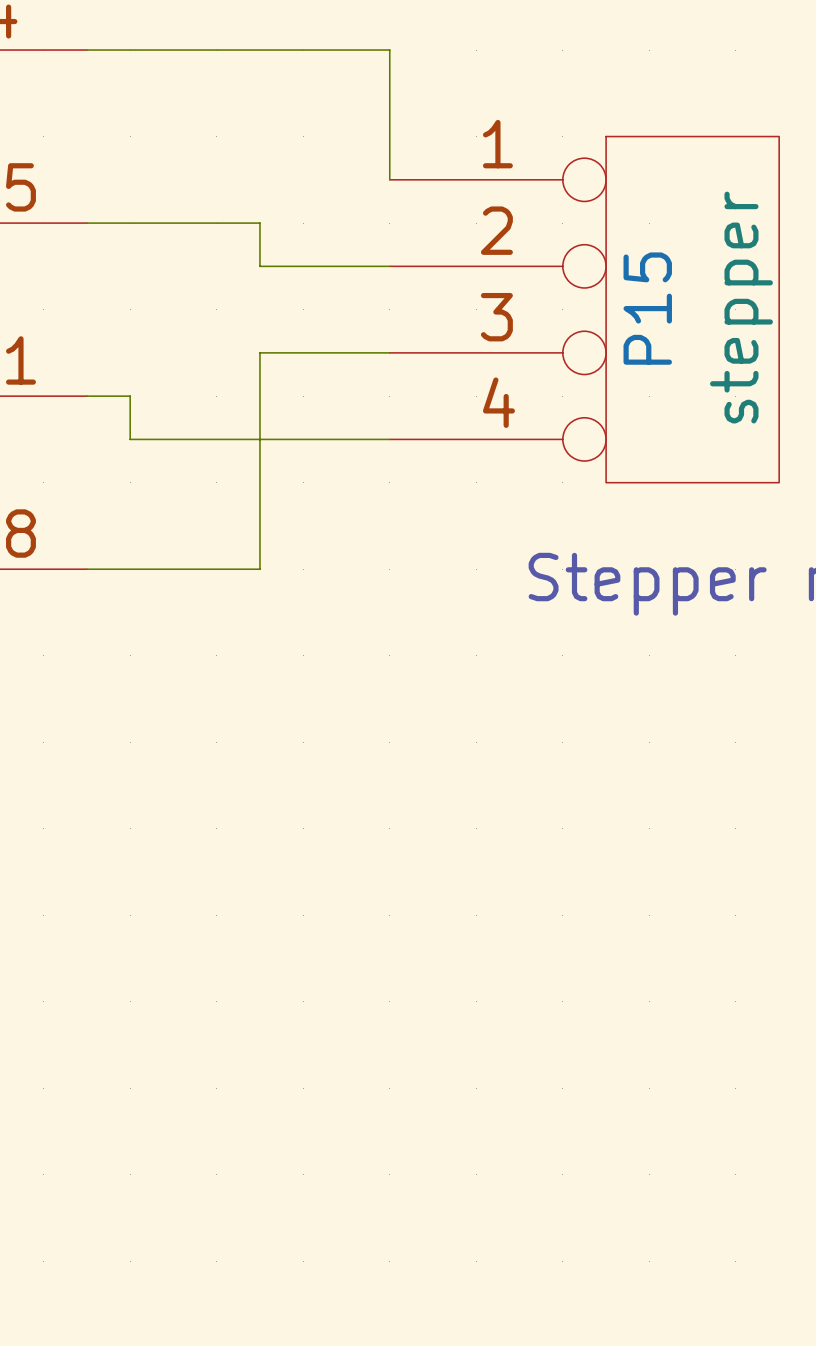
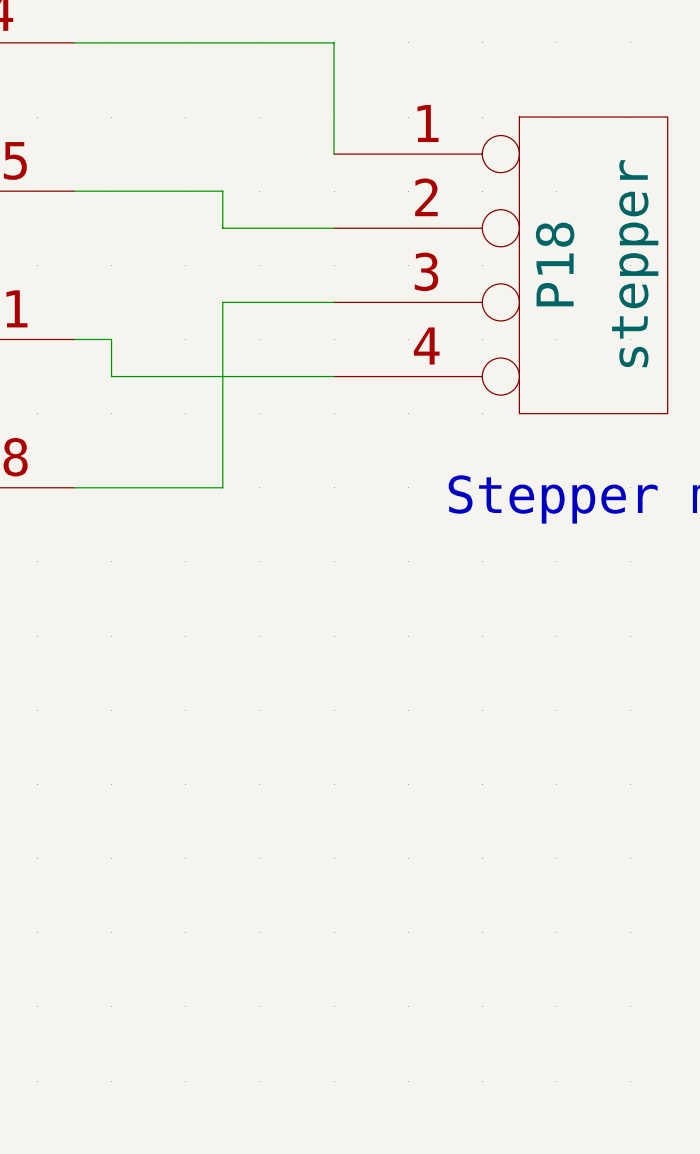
P15 name: P15 (647, 308) -> P18 (555, 264)

